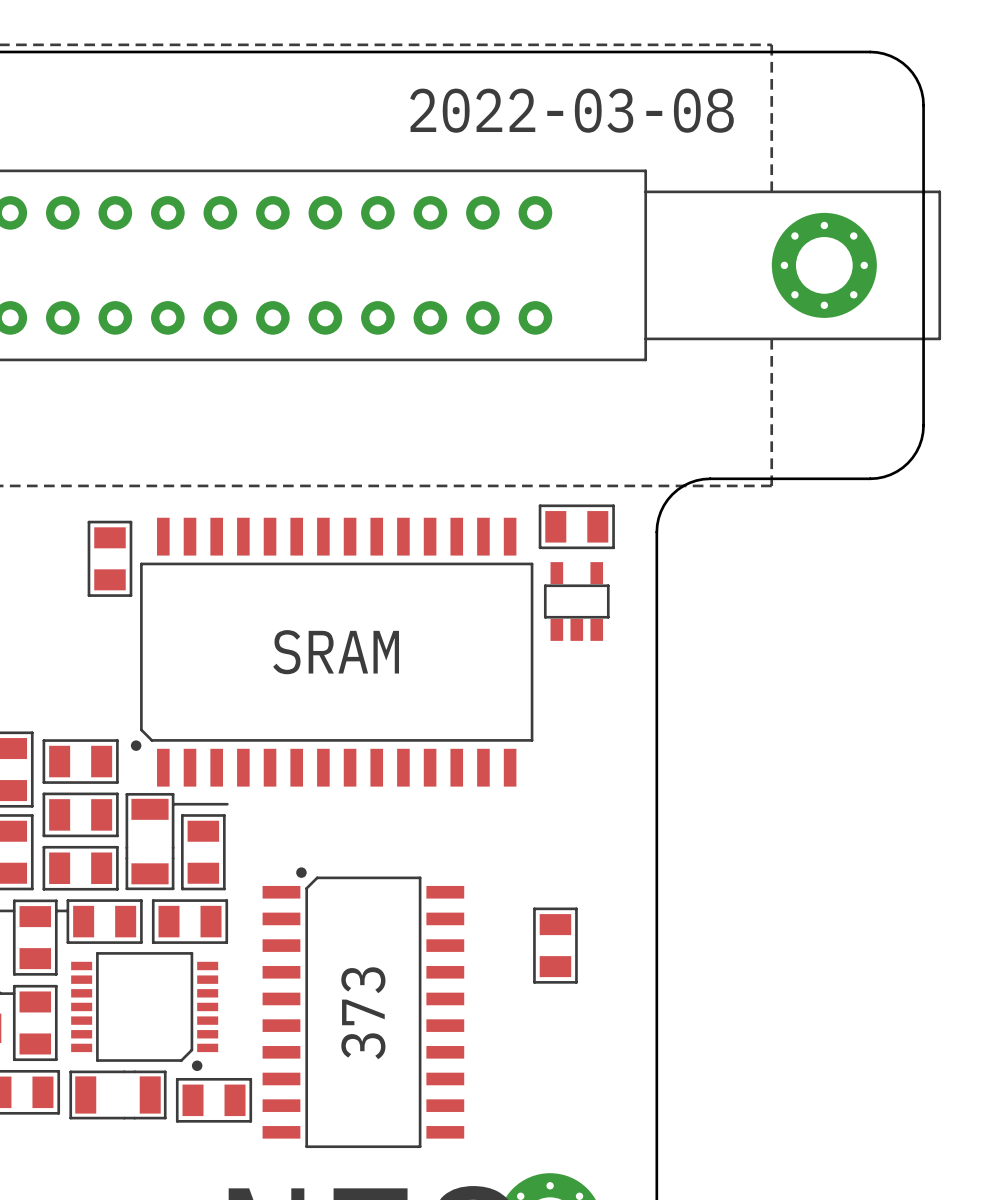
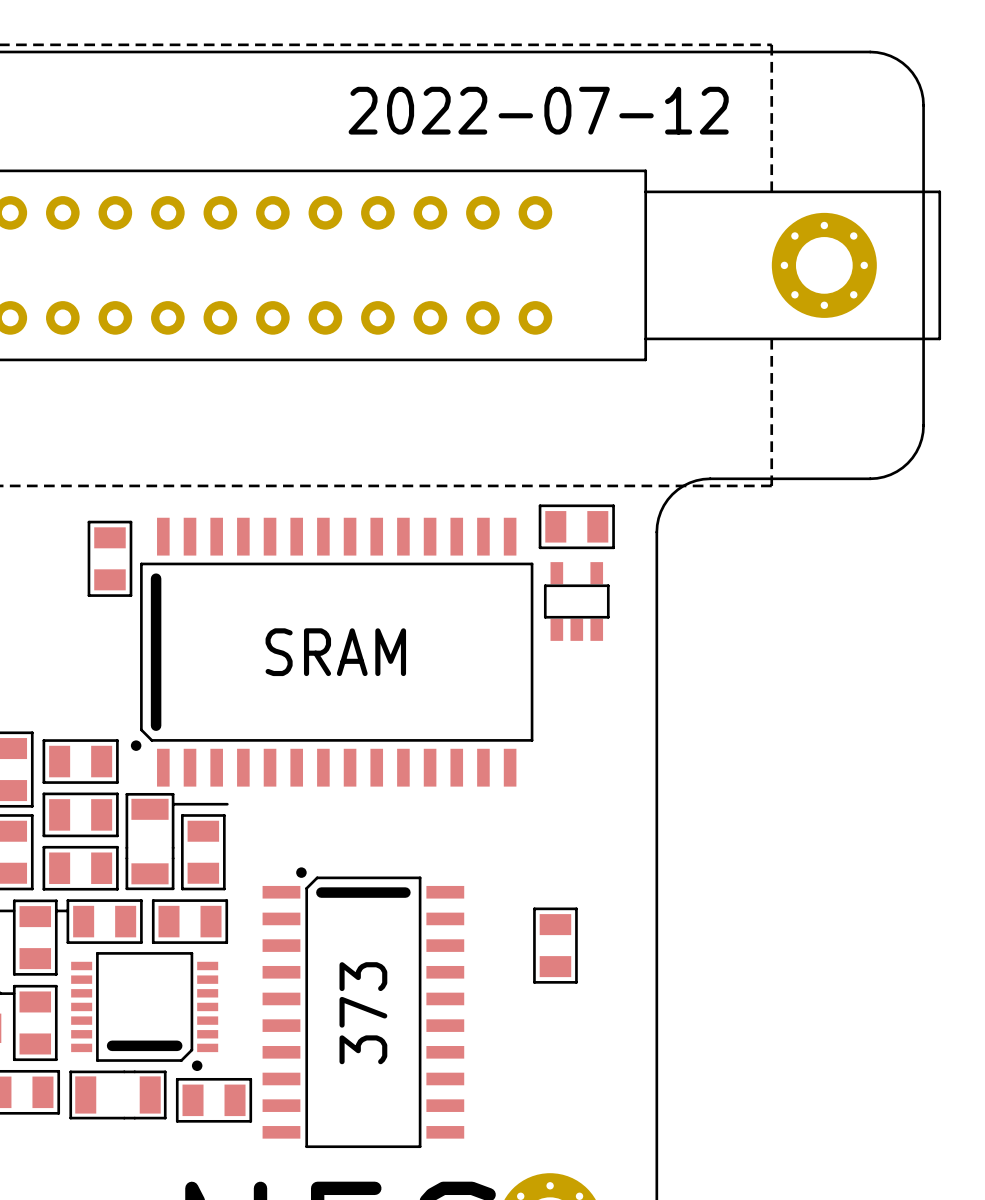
text: 2022-03-08 (572, 110) -> 2022-07-12 (538, 110)
part footprint: [130, 517, 534, 787] -> [130, 517, 534, 787]
part footprint: [262, 867, 465, 1149] -> [262, 867, 465, 1149]
part footprint: [71, 952, 219, 1072] -> [71, 952, 219, 1072]

